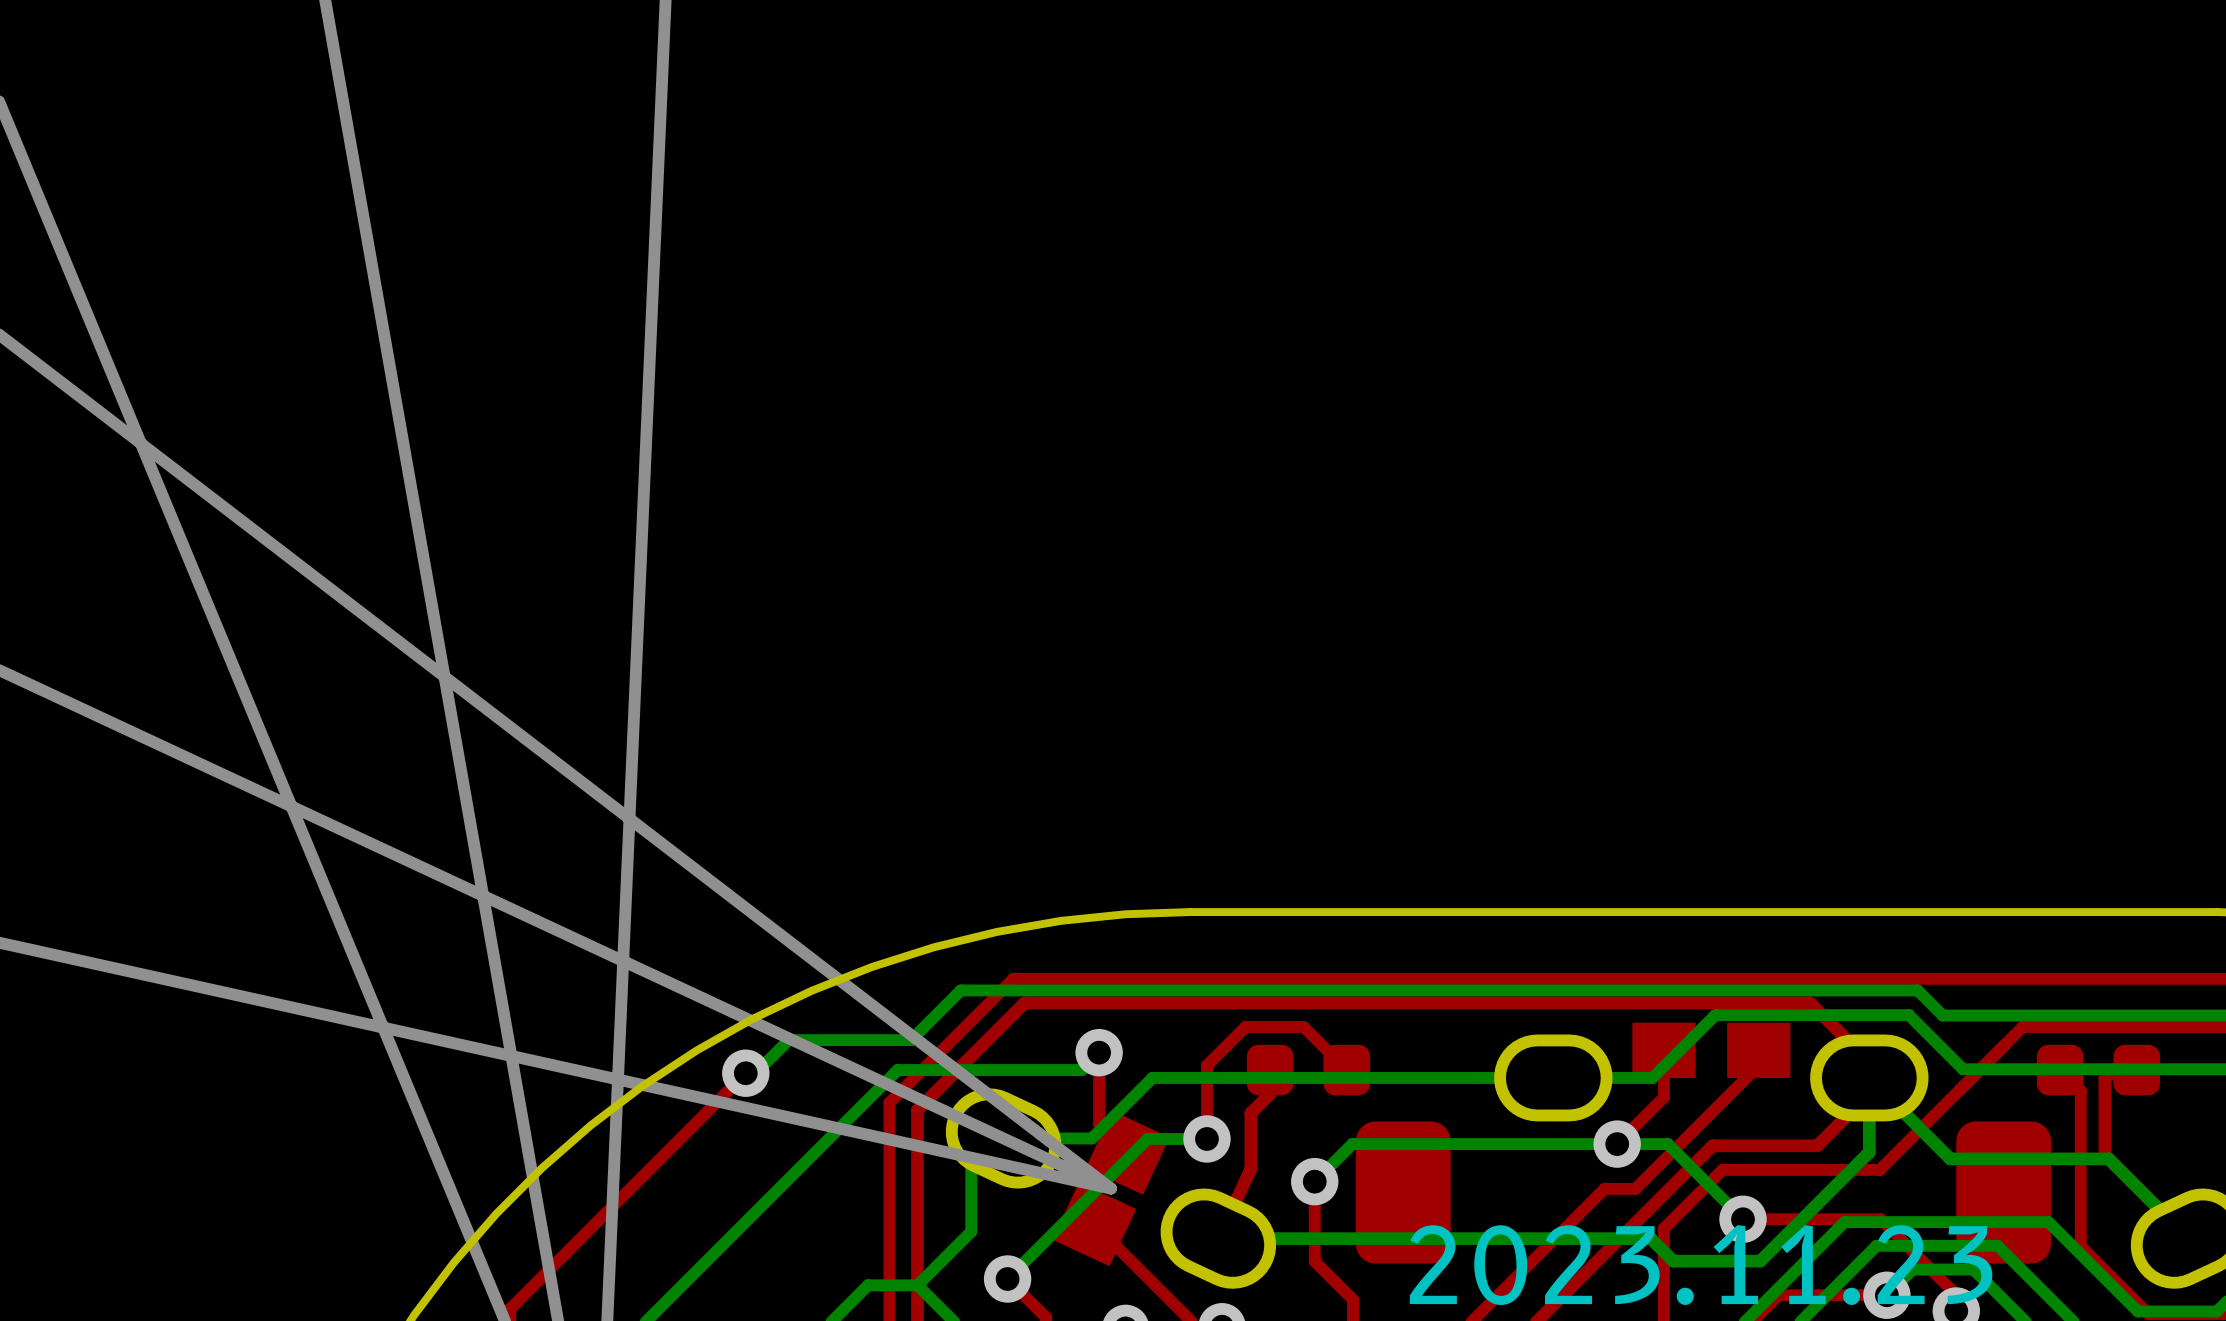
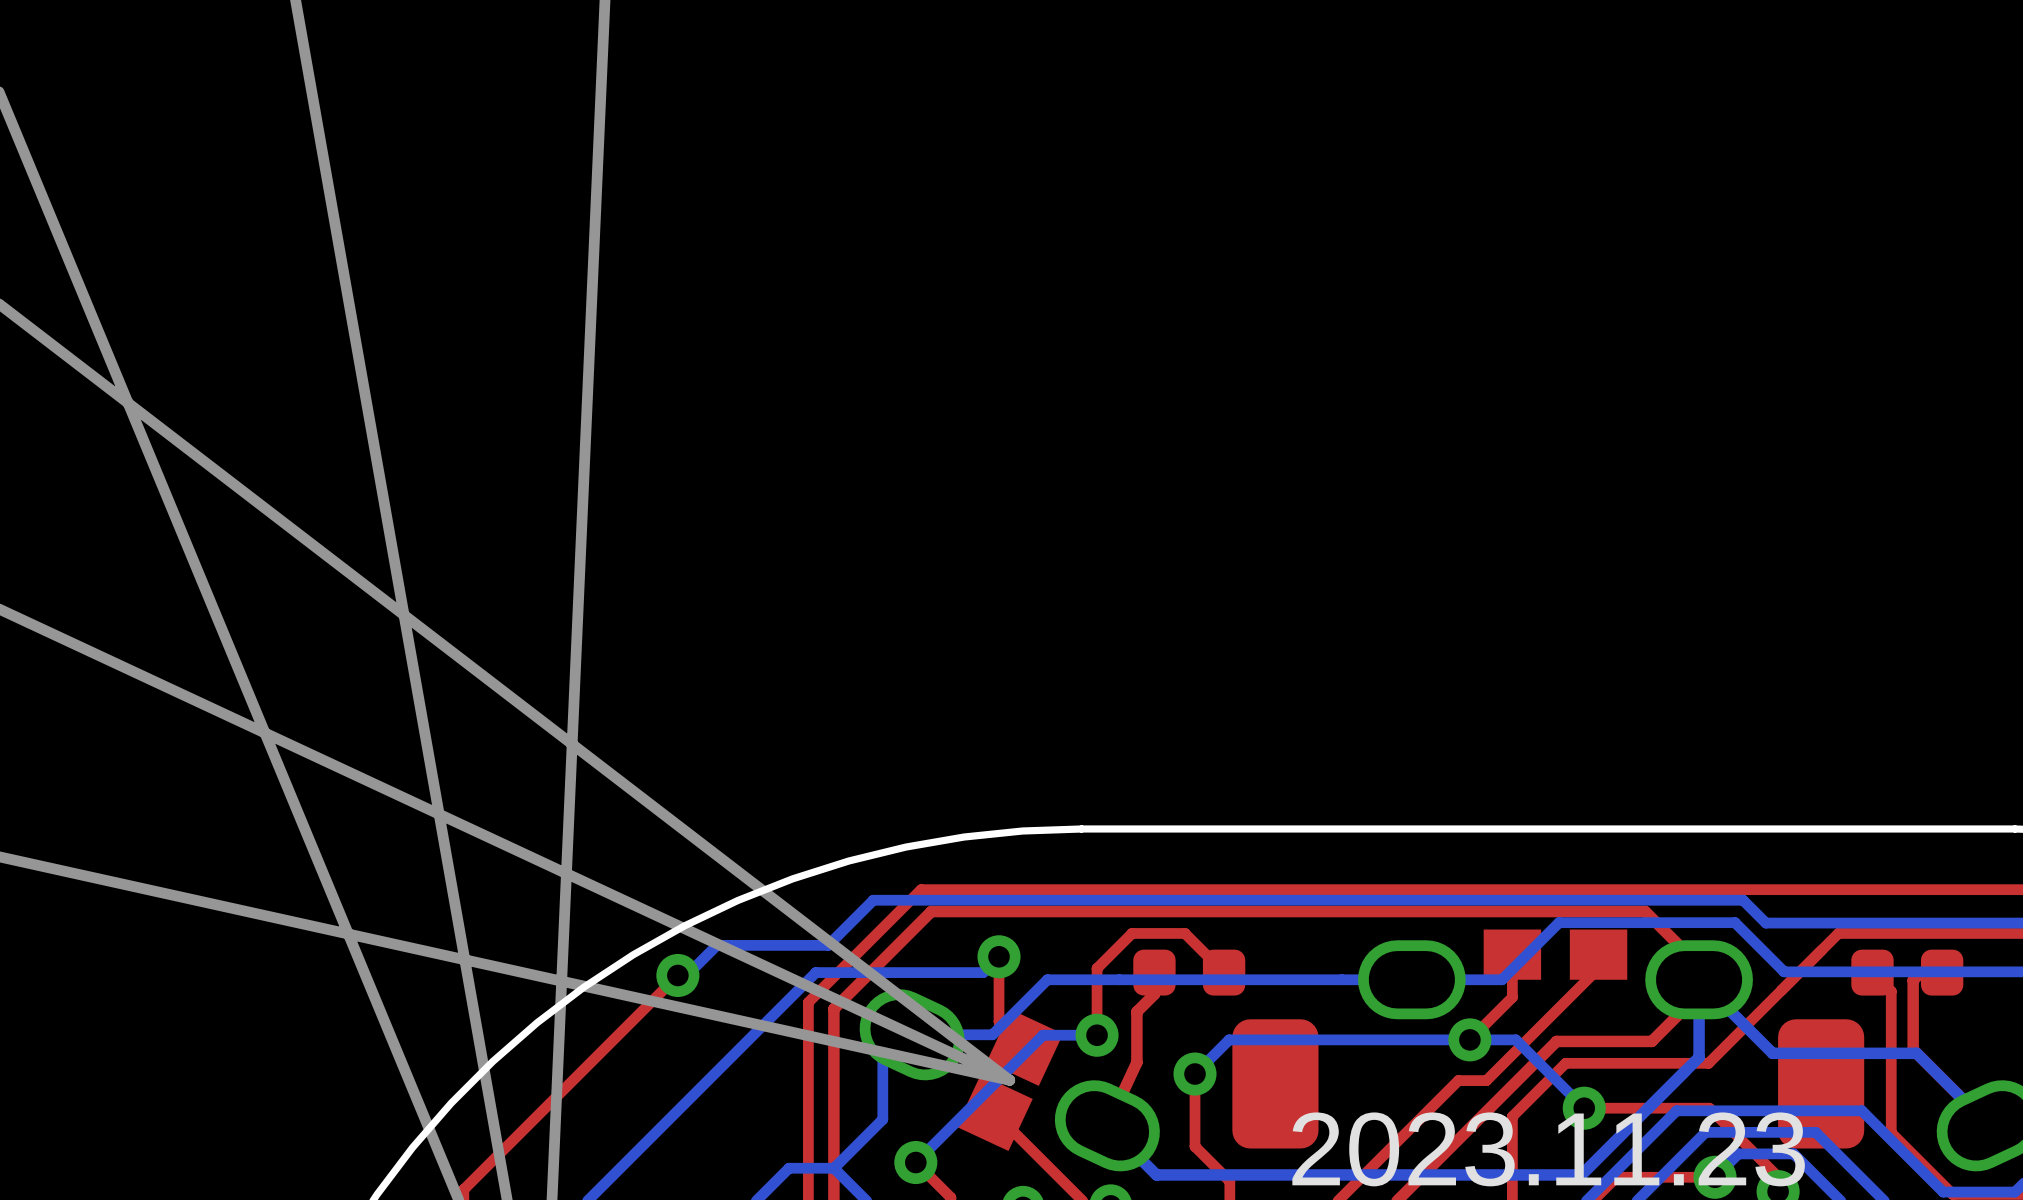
bottom track: (1869, 1152) (1760, 1261) (1673, 1261) (1650, 1238) (1218, 1238) -> (1699, 1047) (1699, 1057) (1581, 1174) (1156, 1174) (1107, 1125)

